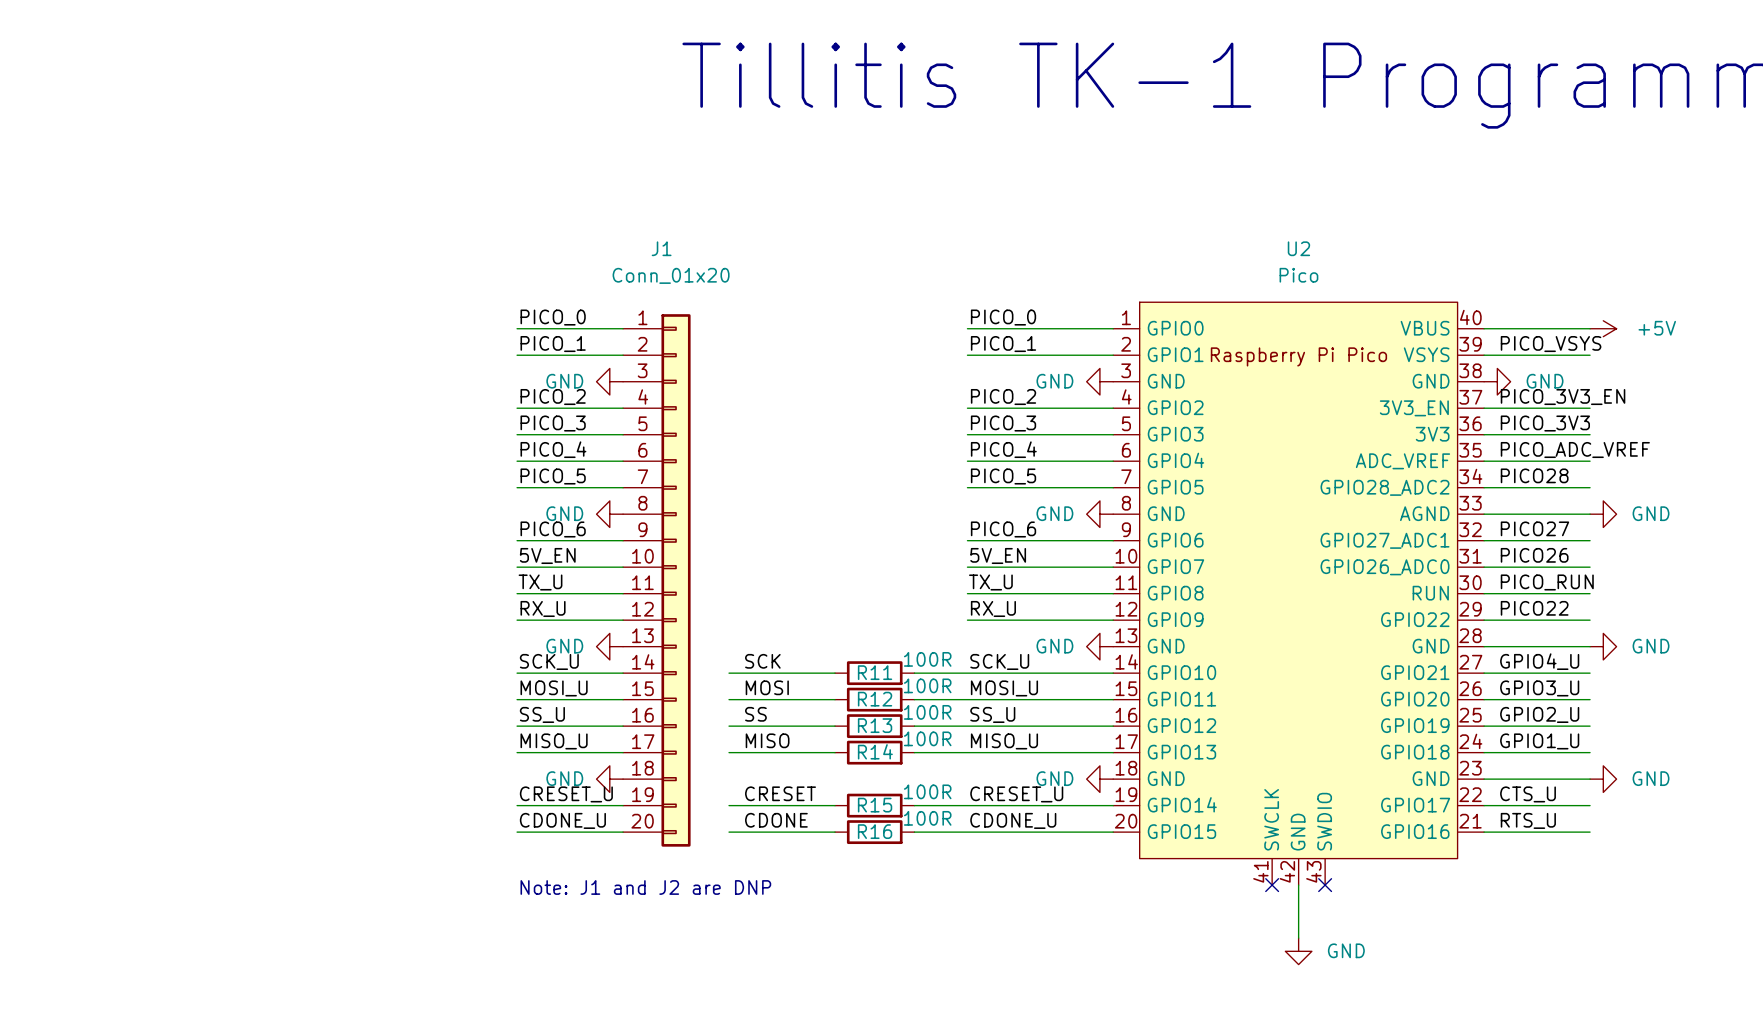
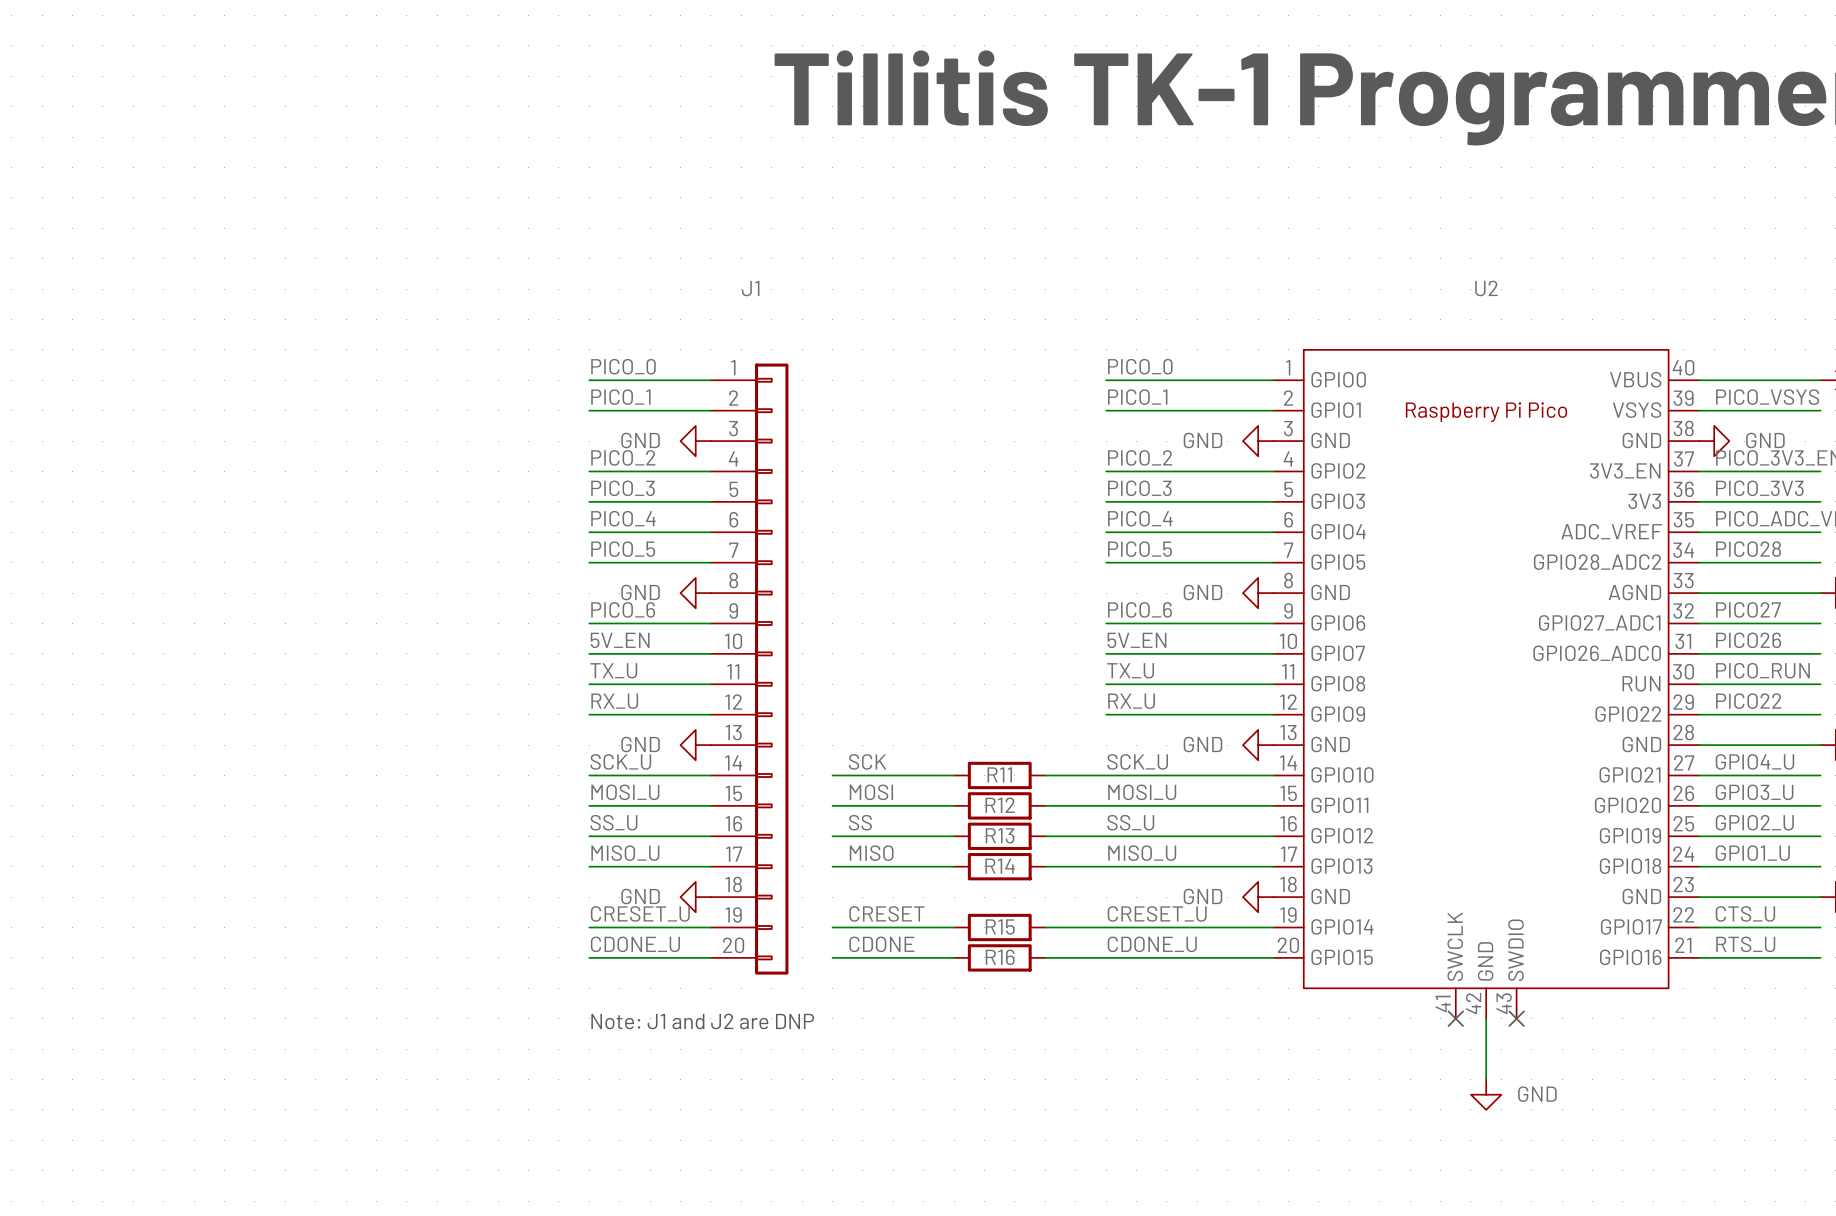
J1 value: Conn_01x20 (671, 275) -> none
U2 value: Pico (1298, 275) -> none
R11 value: 100R (927, 659) -> none
R12 value: 100R (927, 685) -> none
R13 value: 100R (927, 712) -> none
R14 value: 100R (927, 738) -> none
R15 value: 100R (927, 791) -> none
R16 value: 100R (927, 818) -> none

